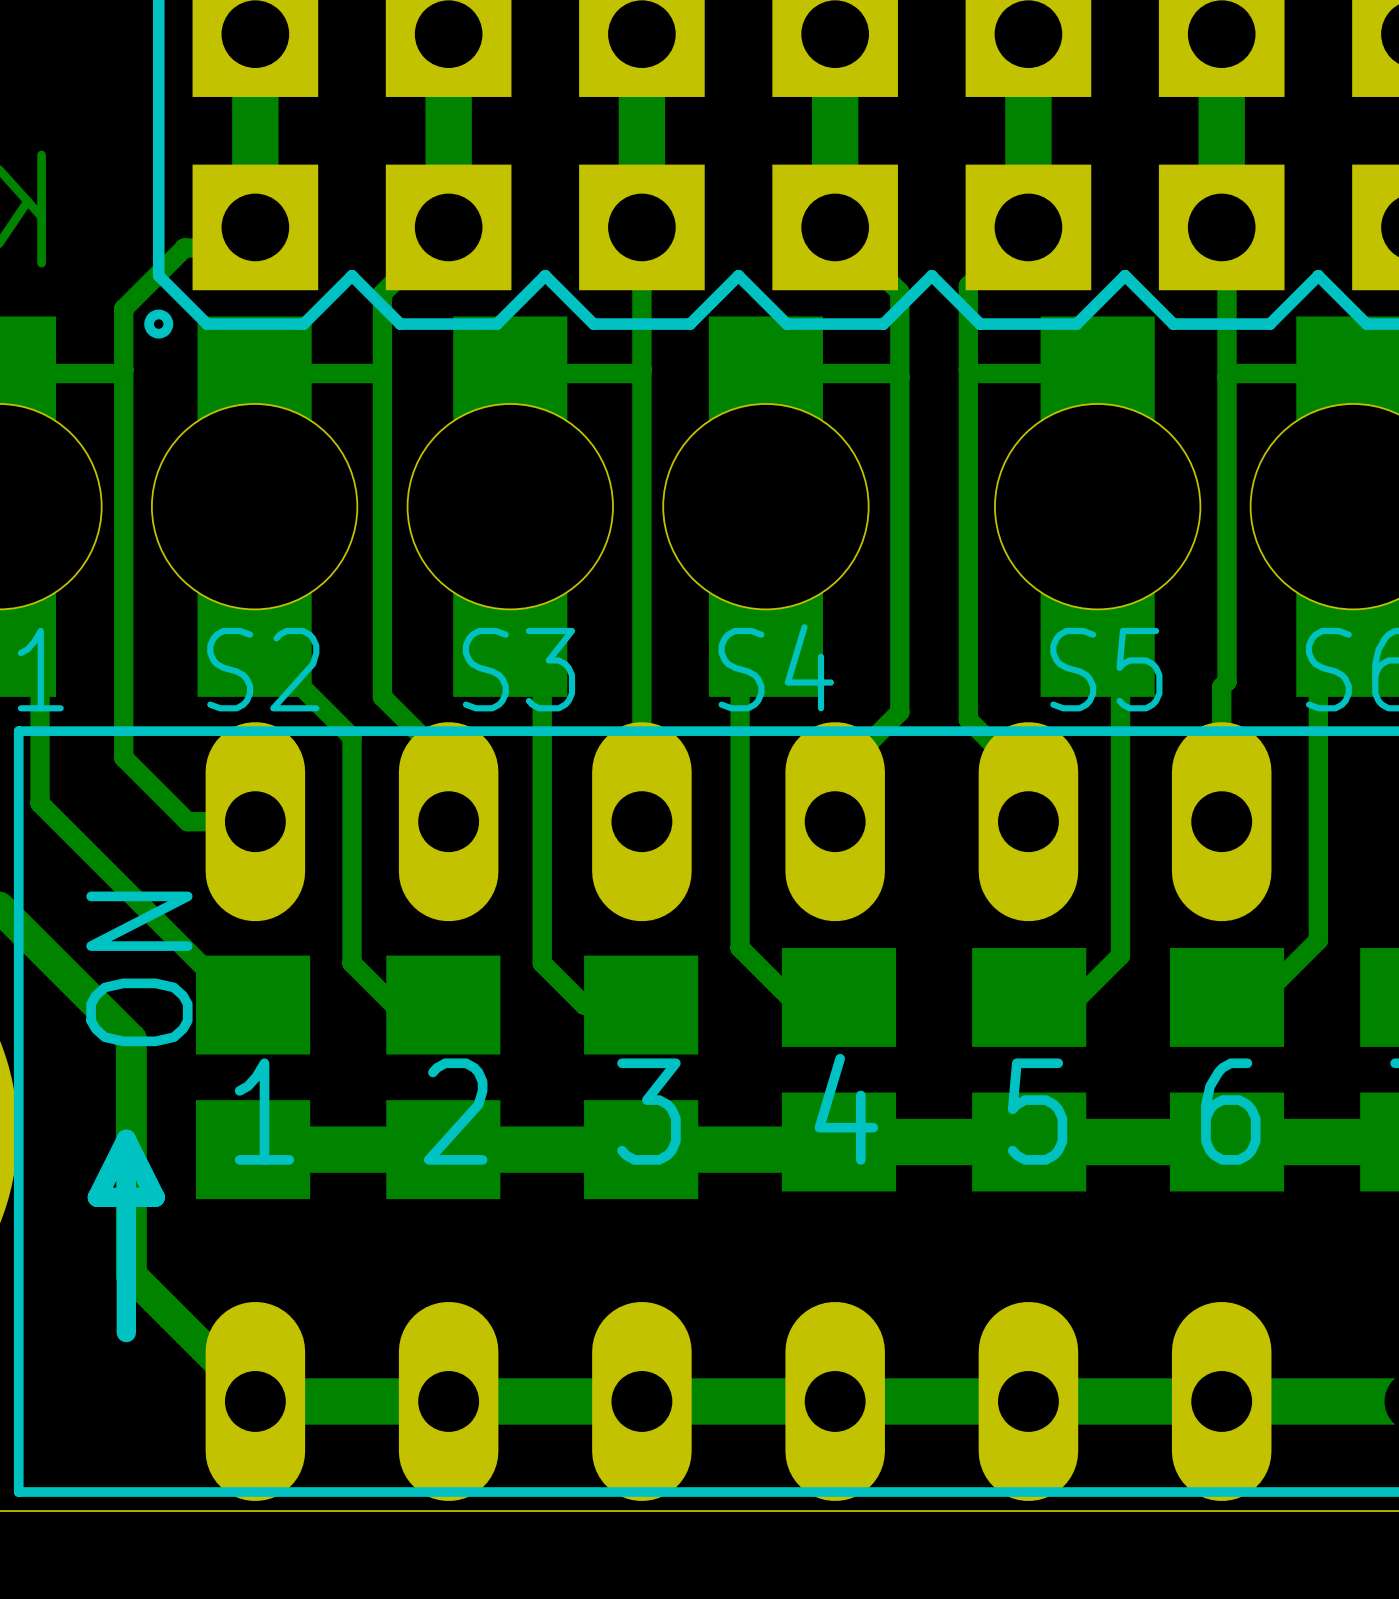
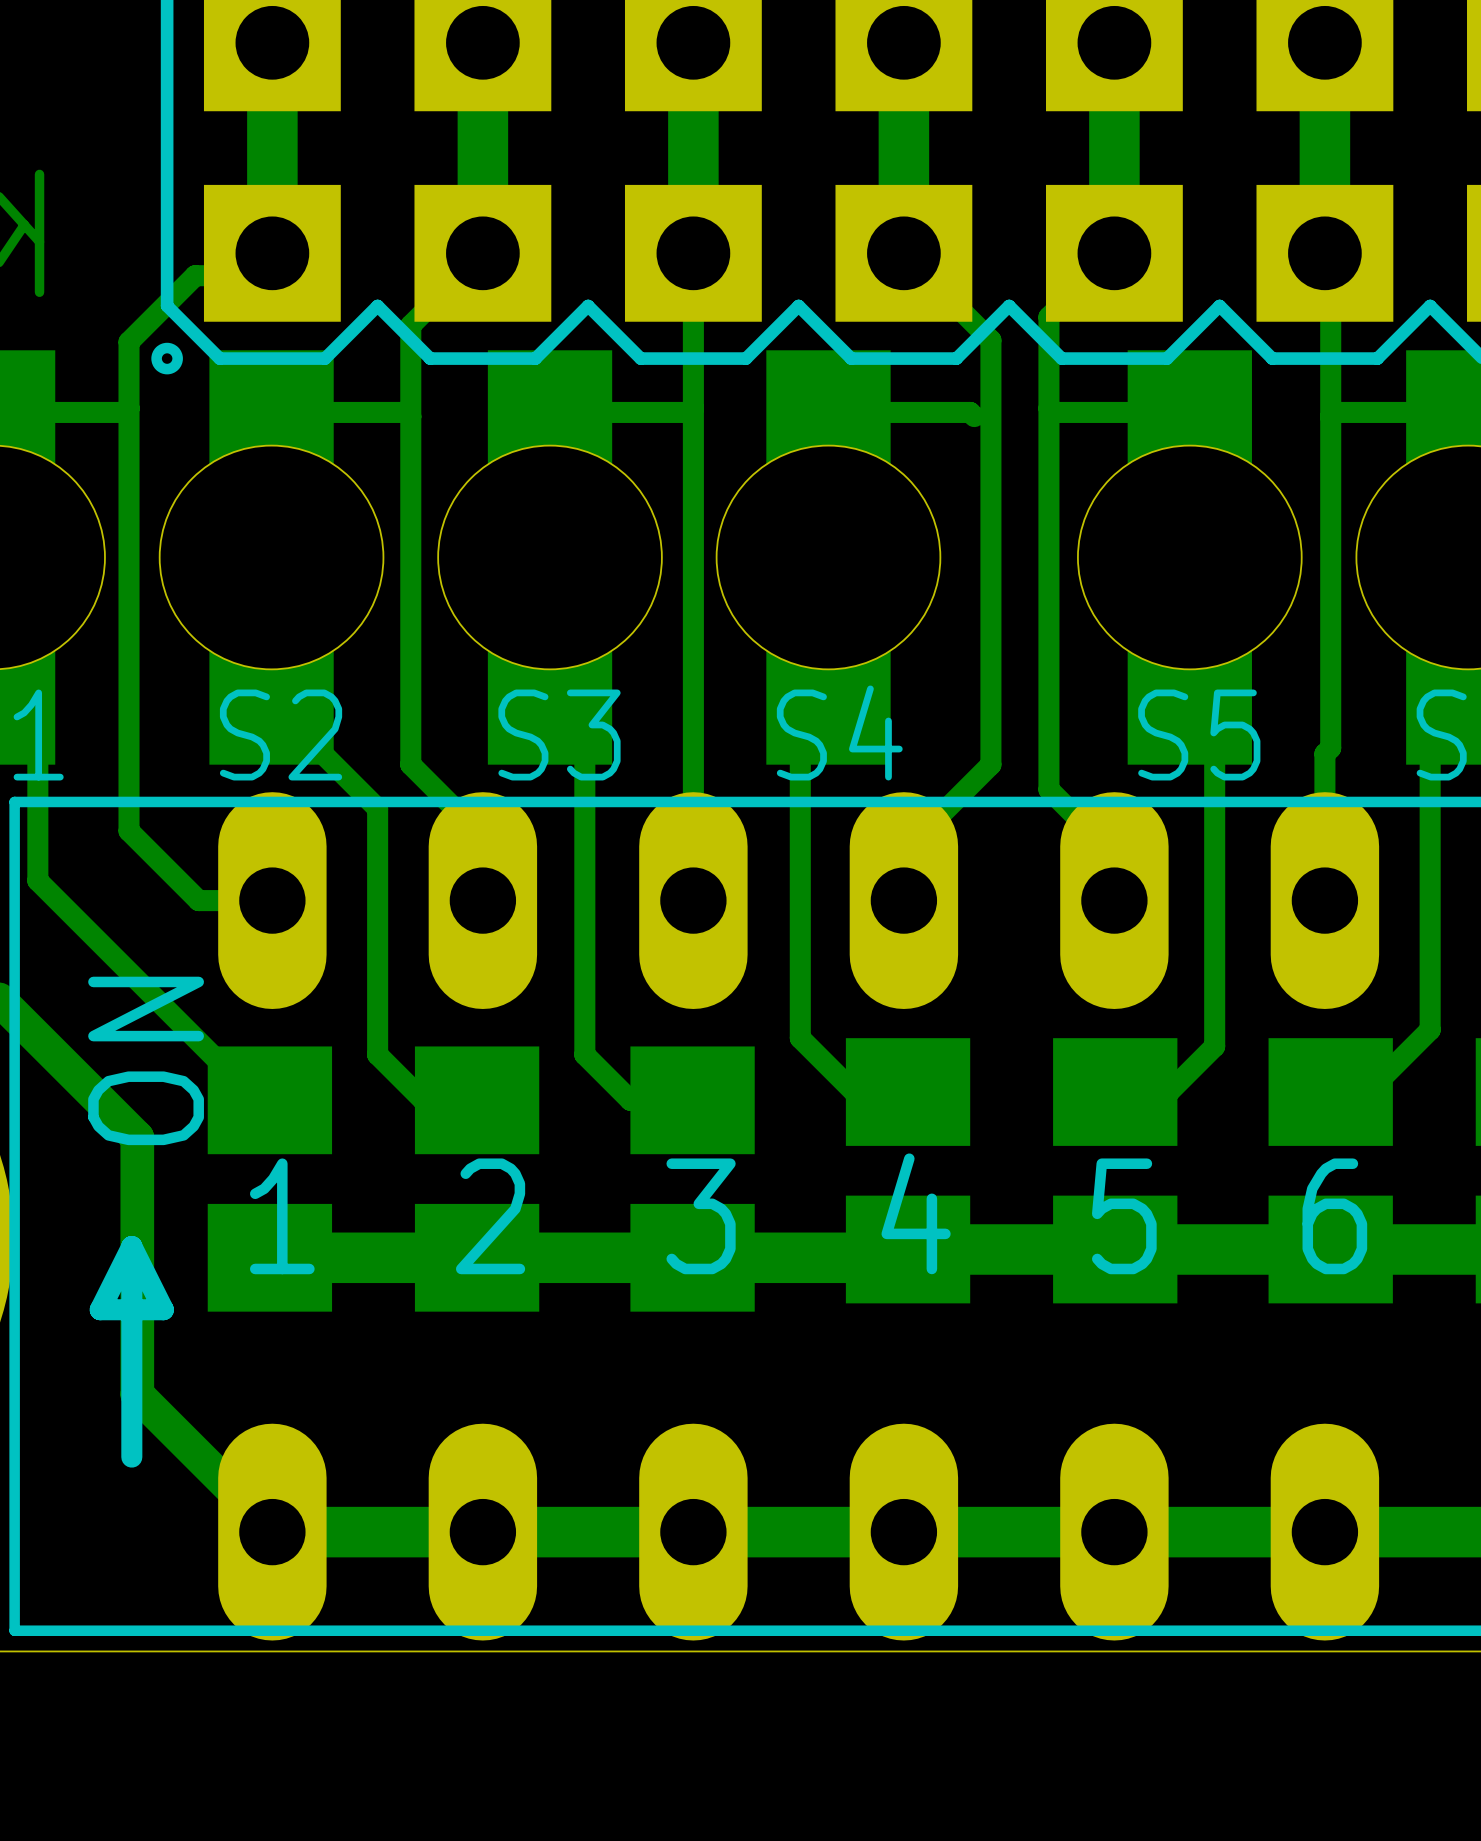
bottom track: (899, 292) (899, 712) -> (974, 323) (990, 340) (990, 764) (974, 781)

